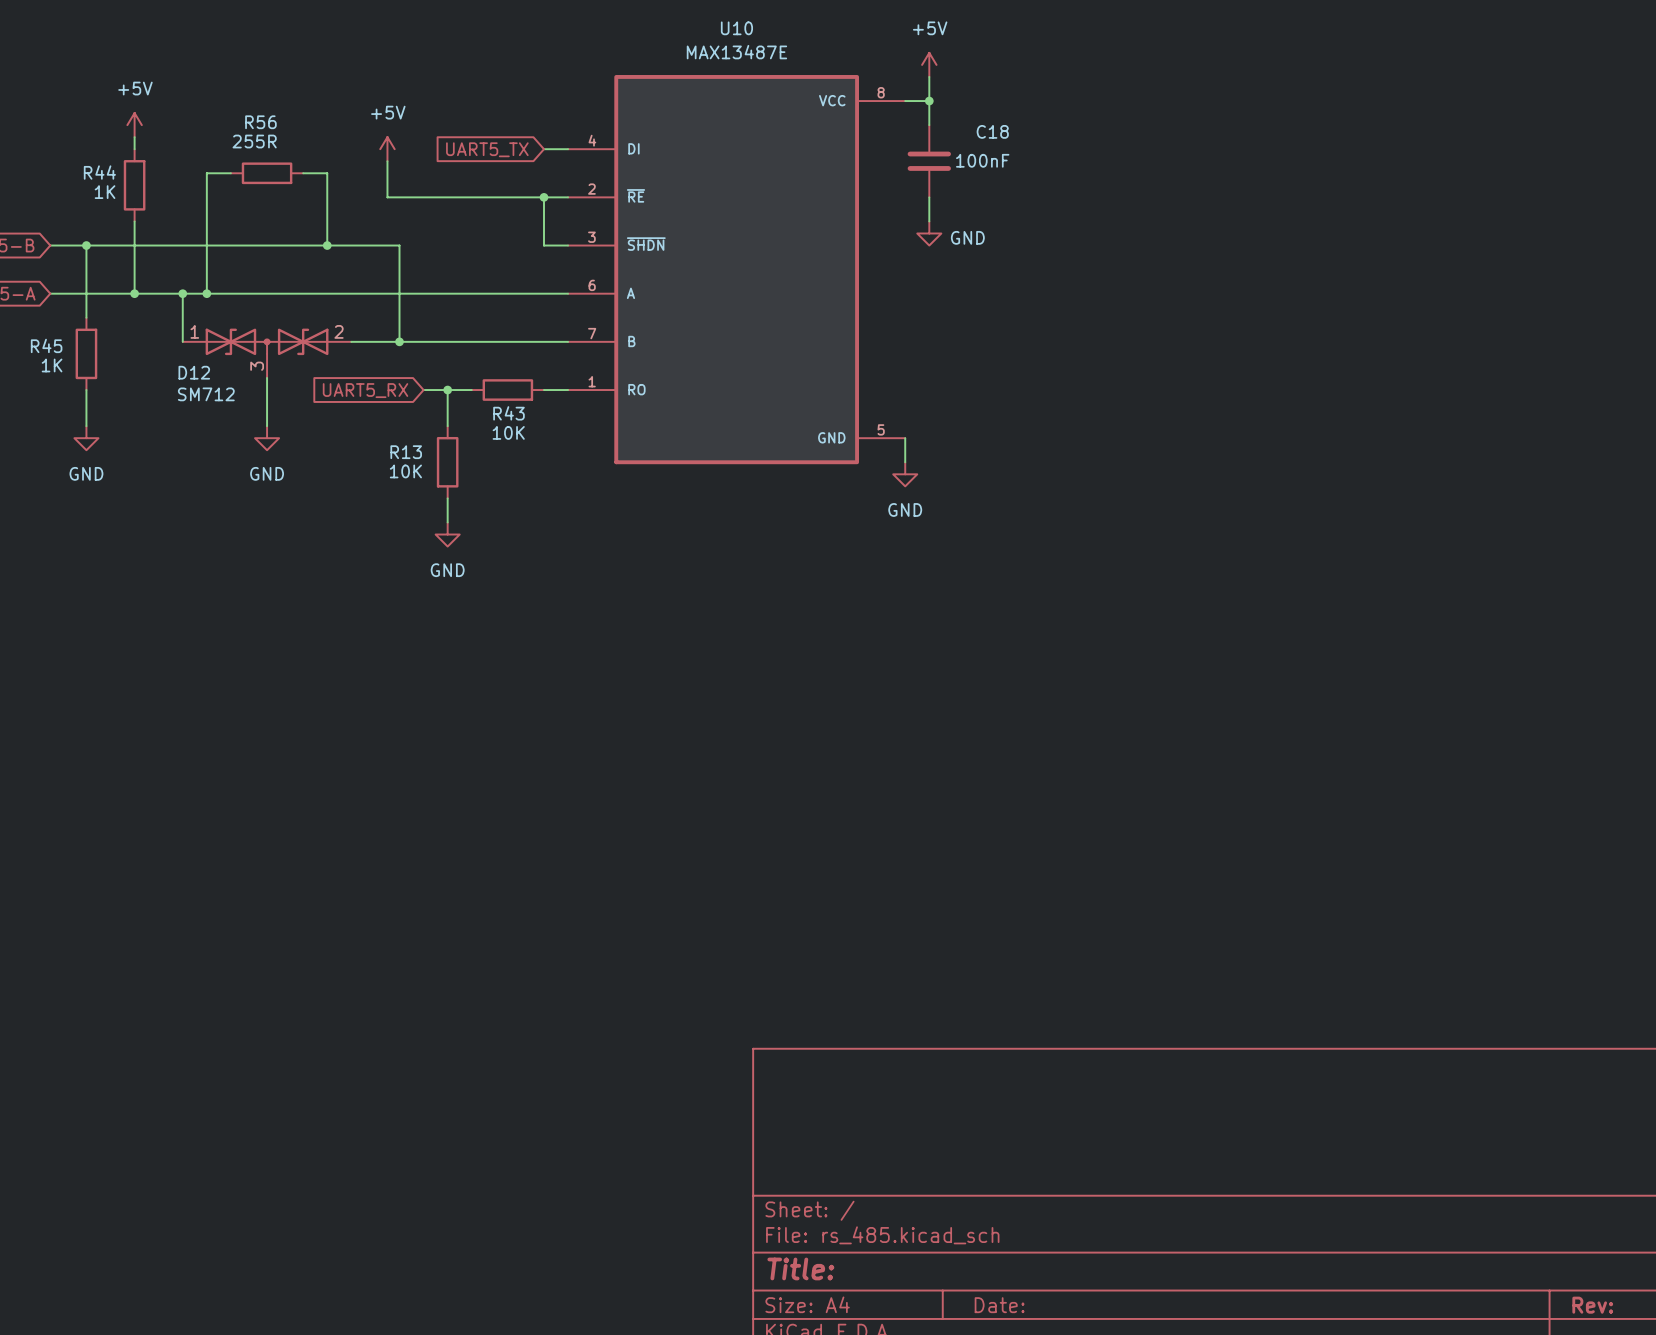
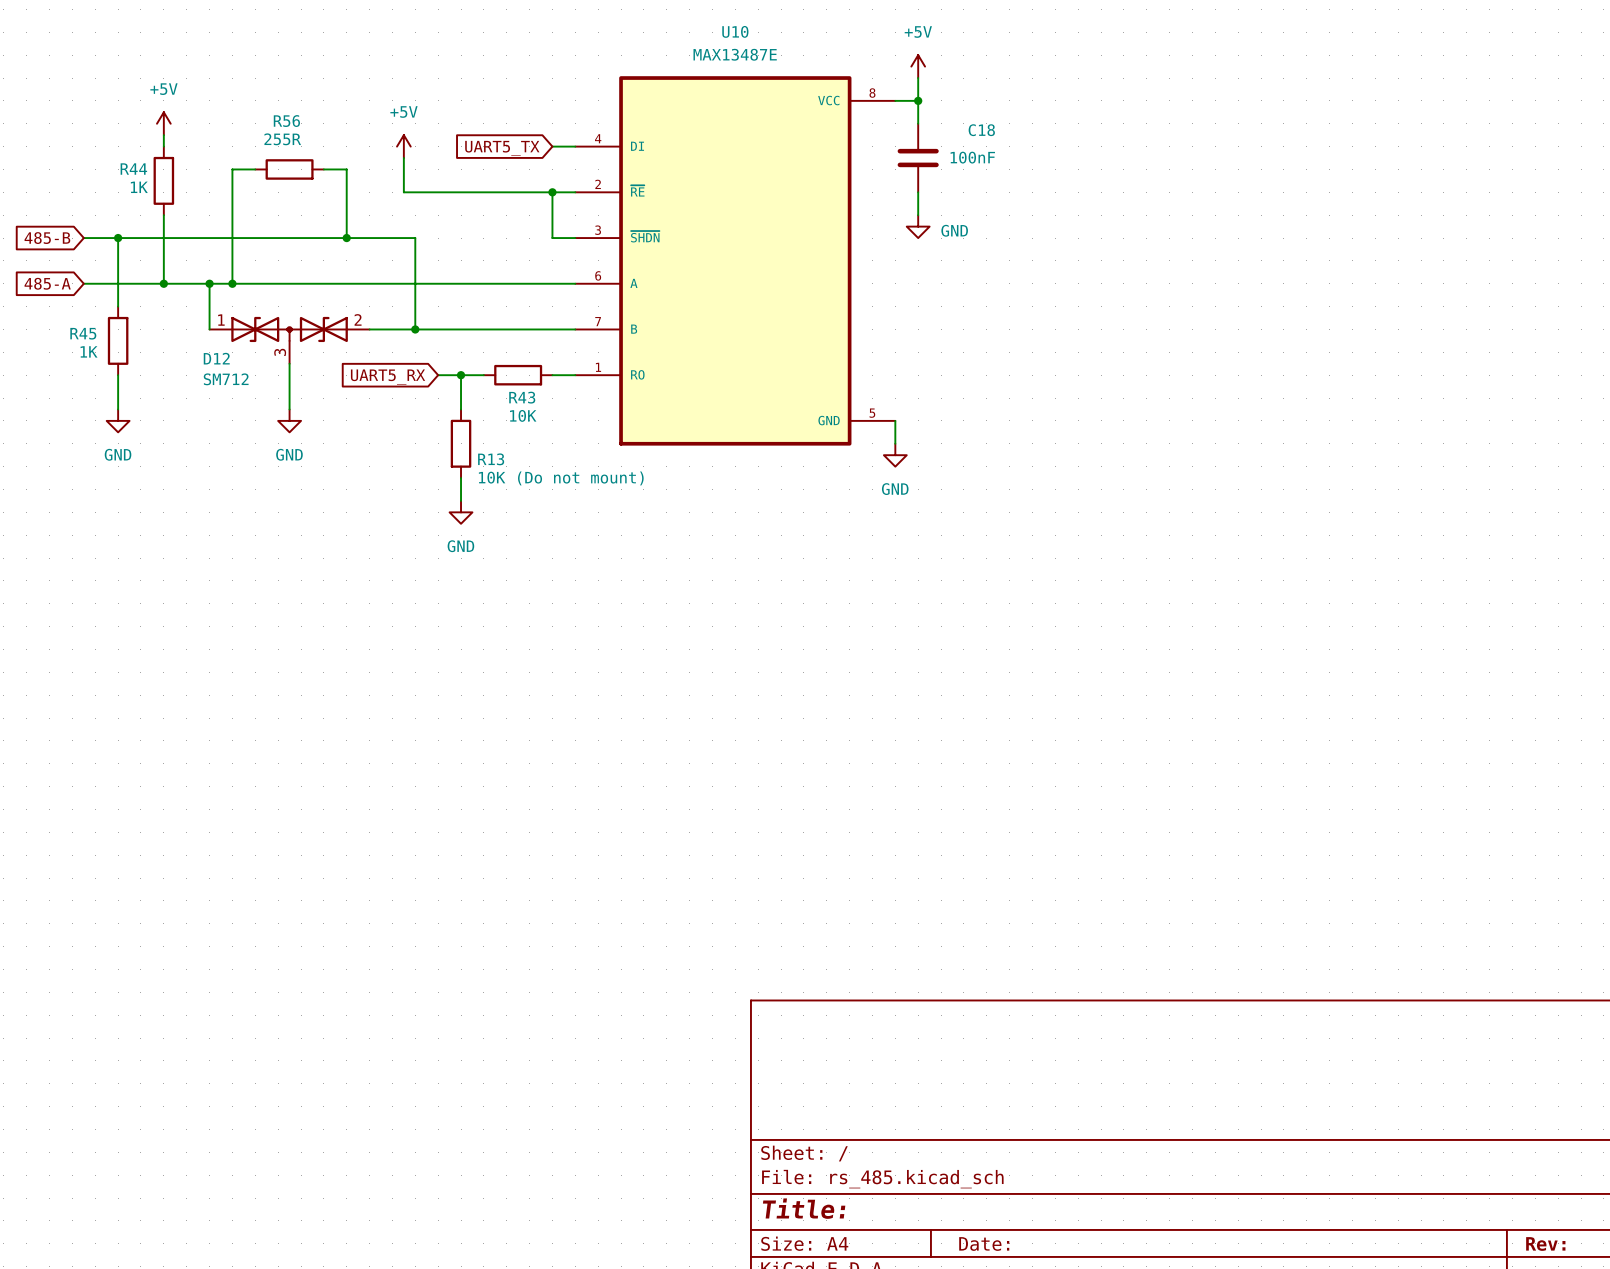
R13 name position: R13 (406, 452) -> R13 (491, 459)
R13 value: 10K (405, 471) -> 10K (Do not mount) (561, 478)

